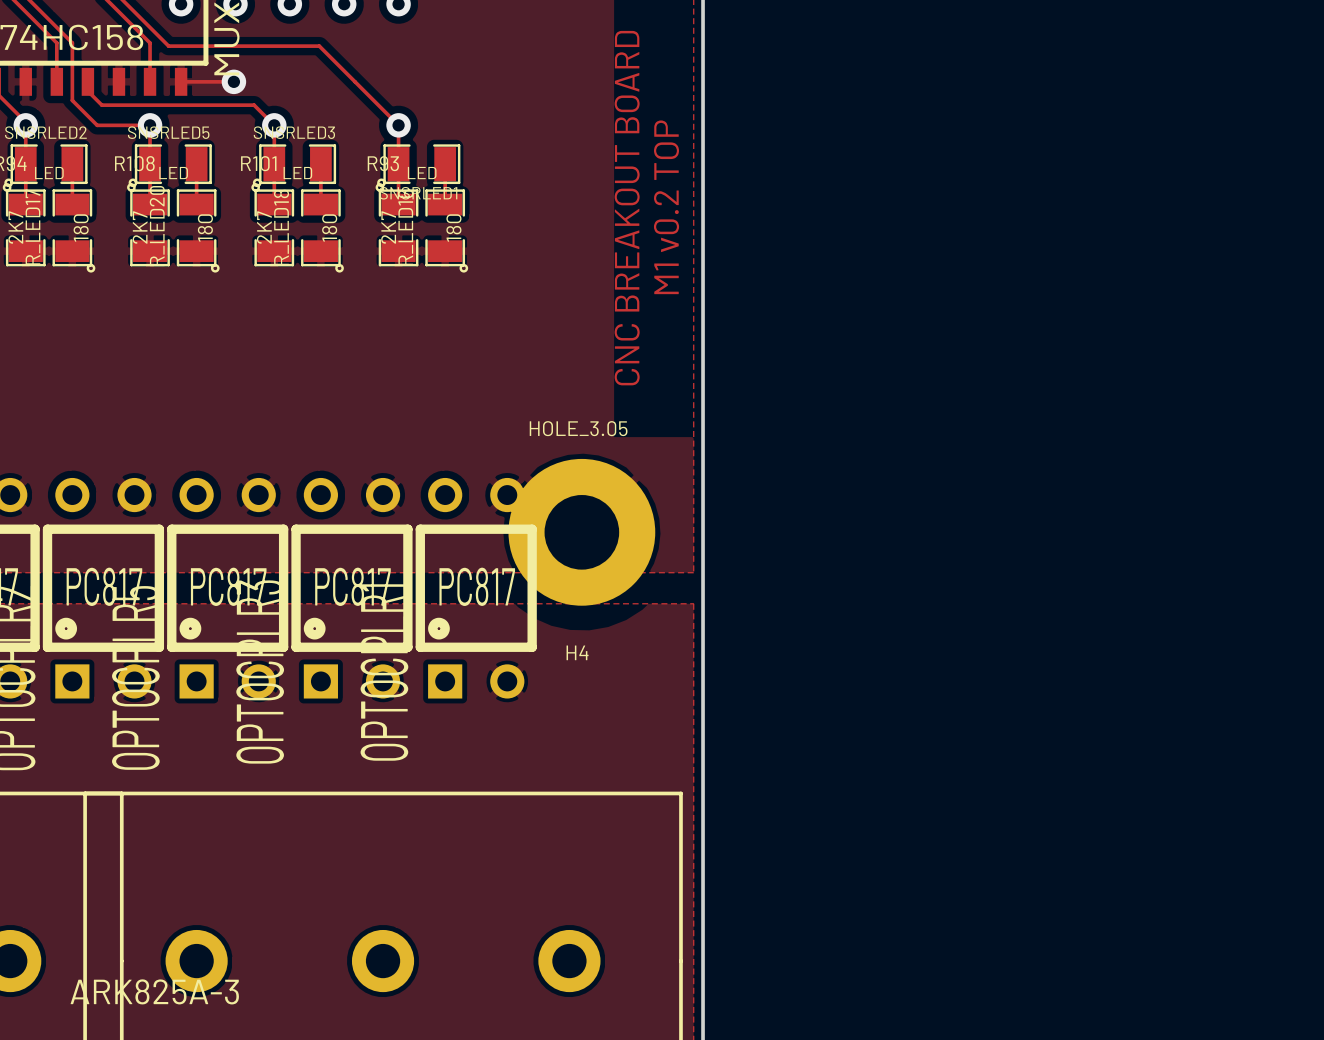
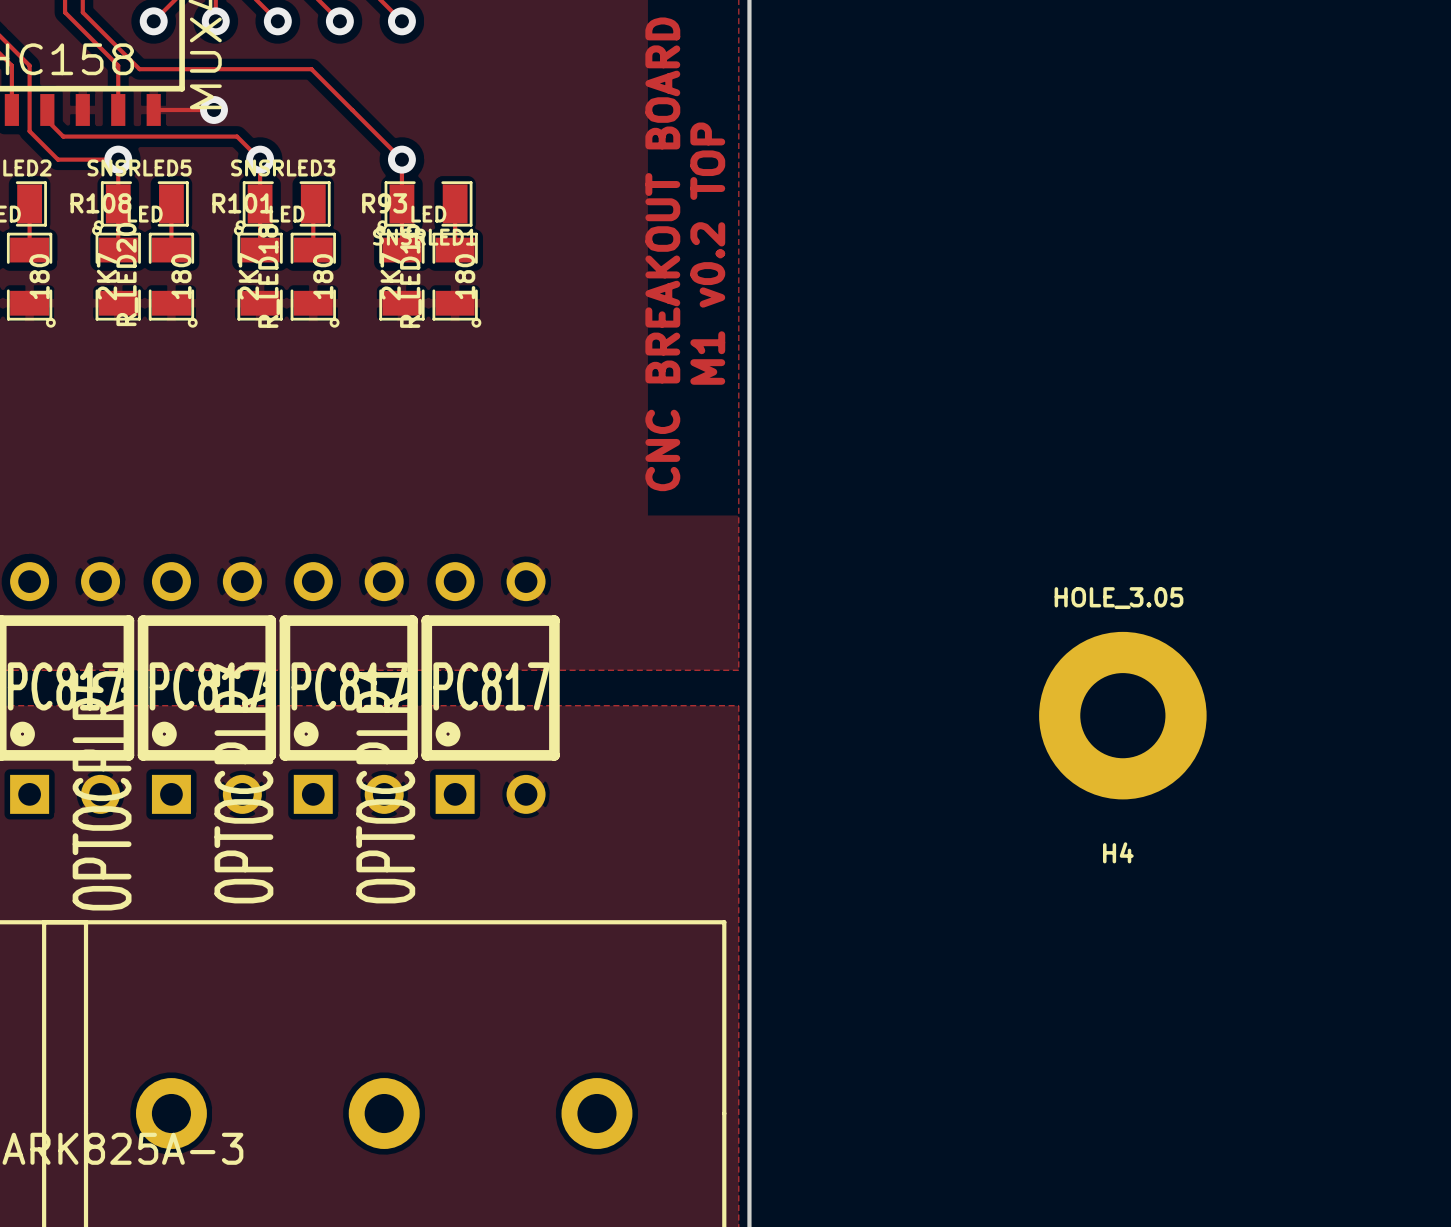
H4 position: (581, 532) -> (1122, 715)

